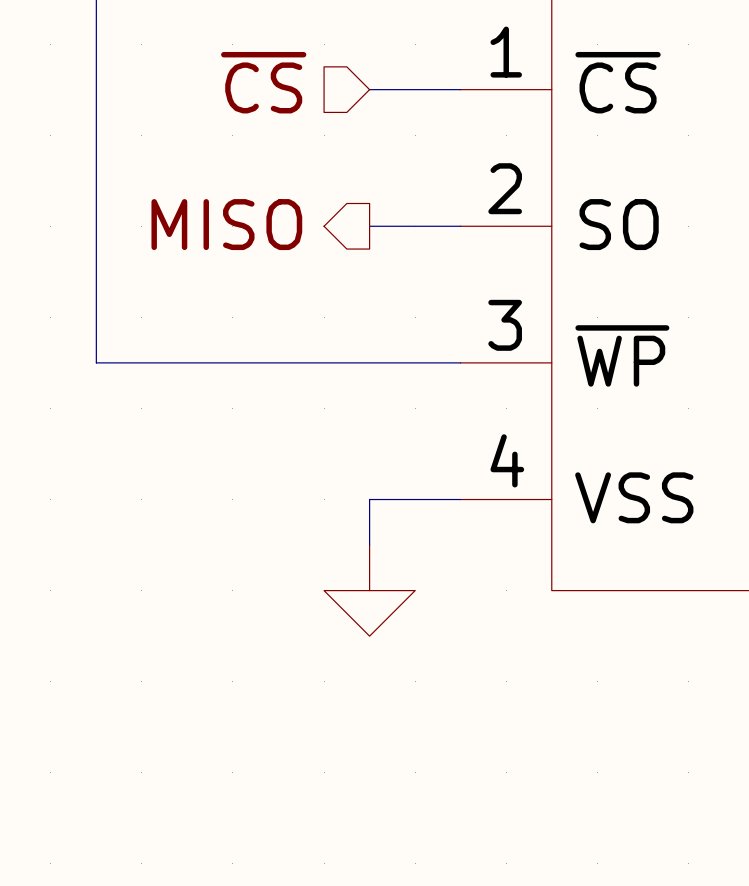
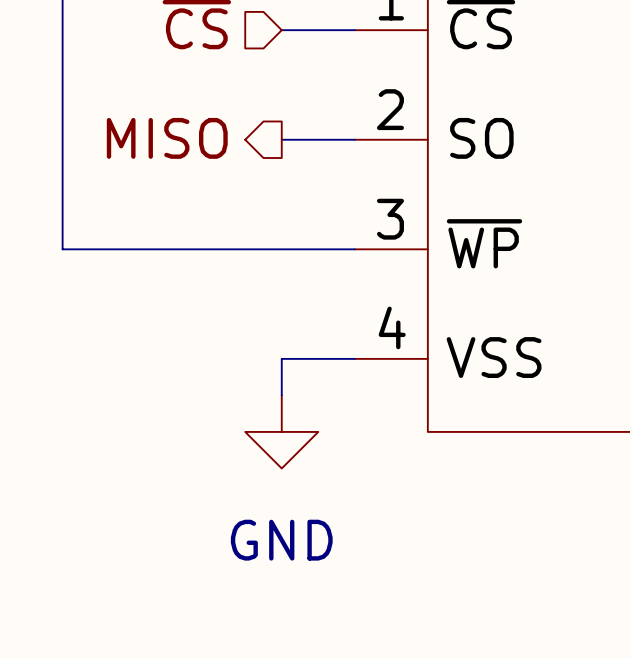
power symbol text: none -> GND (281, 540)

